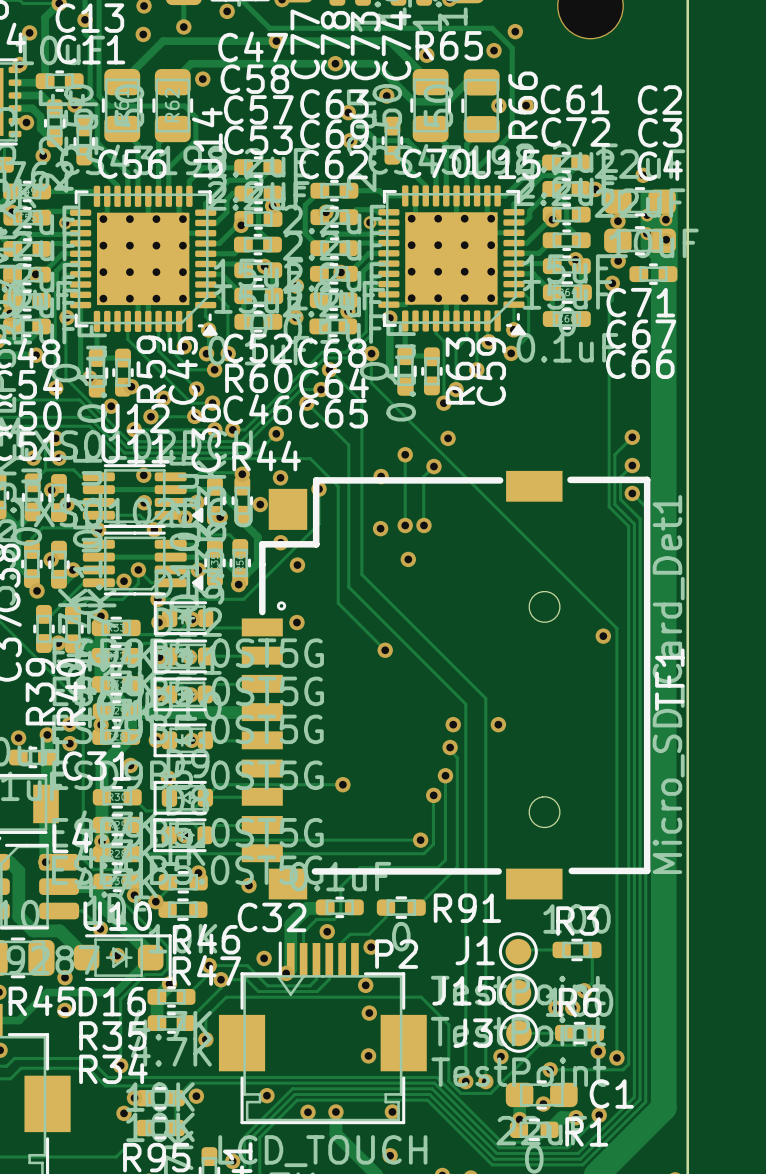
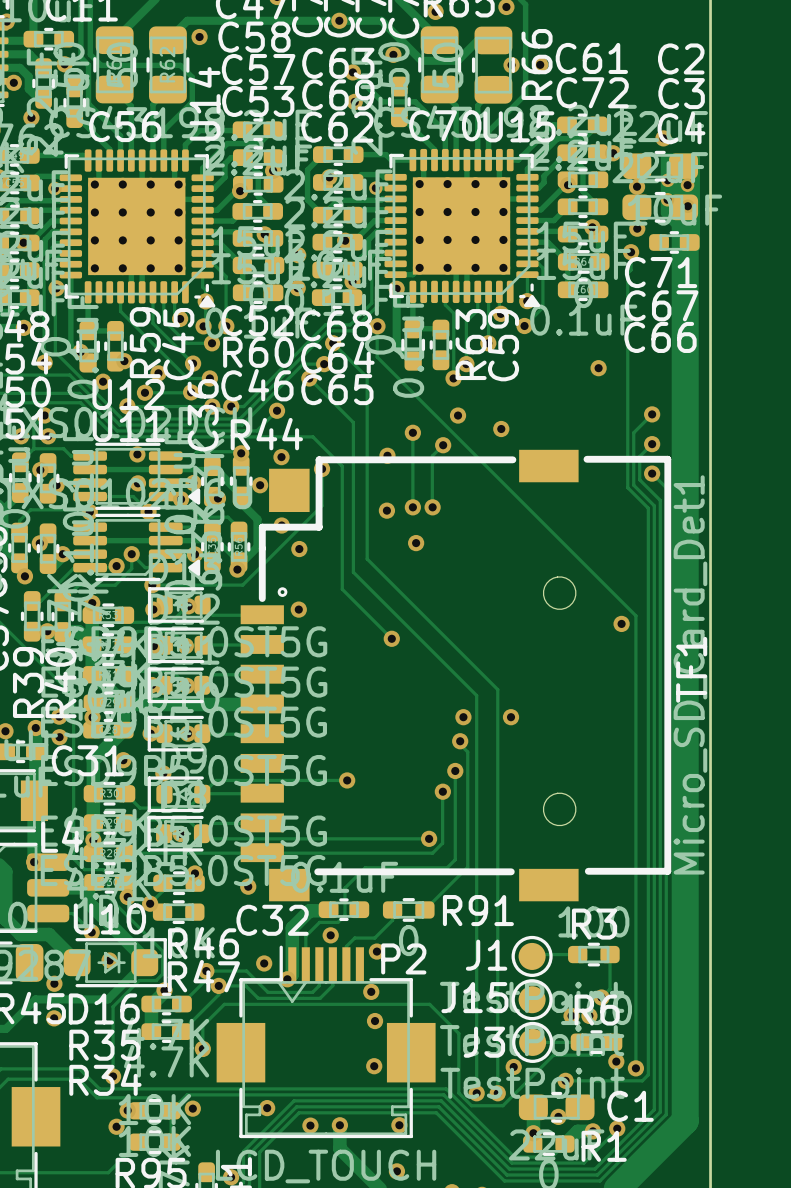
via: none -> (598, 368)
via: none -> (501, 429)

